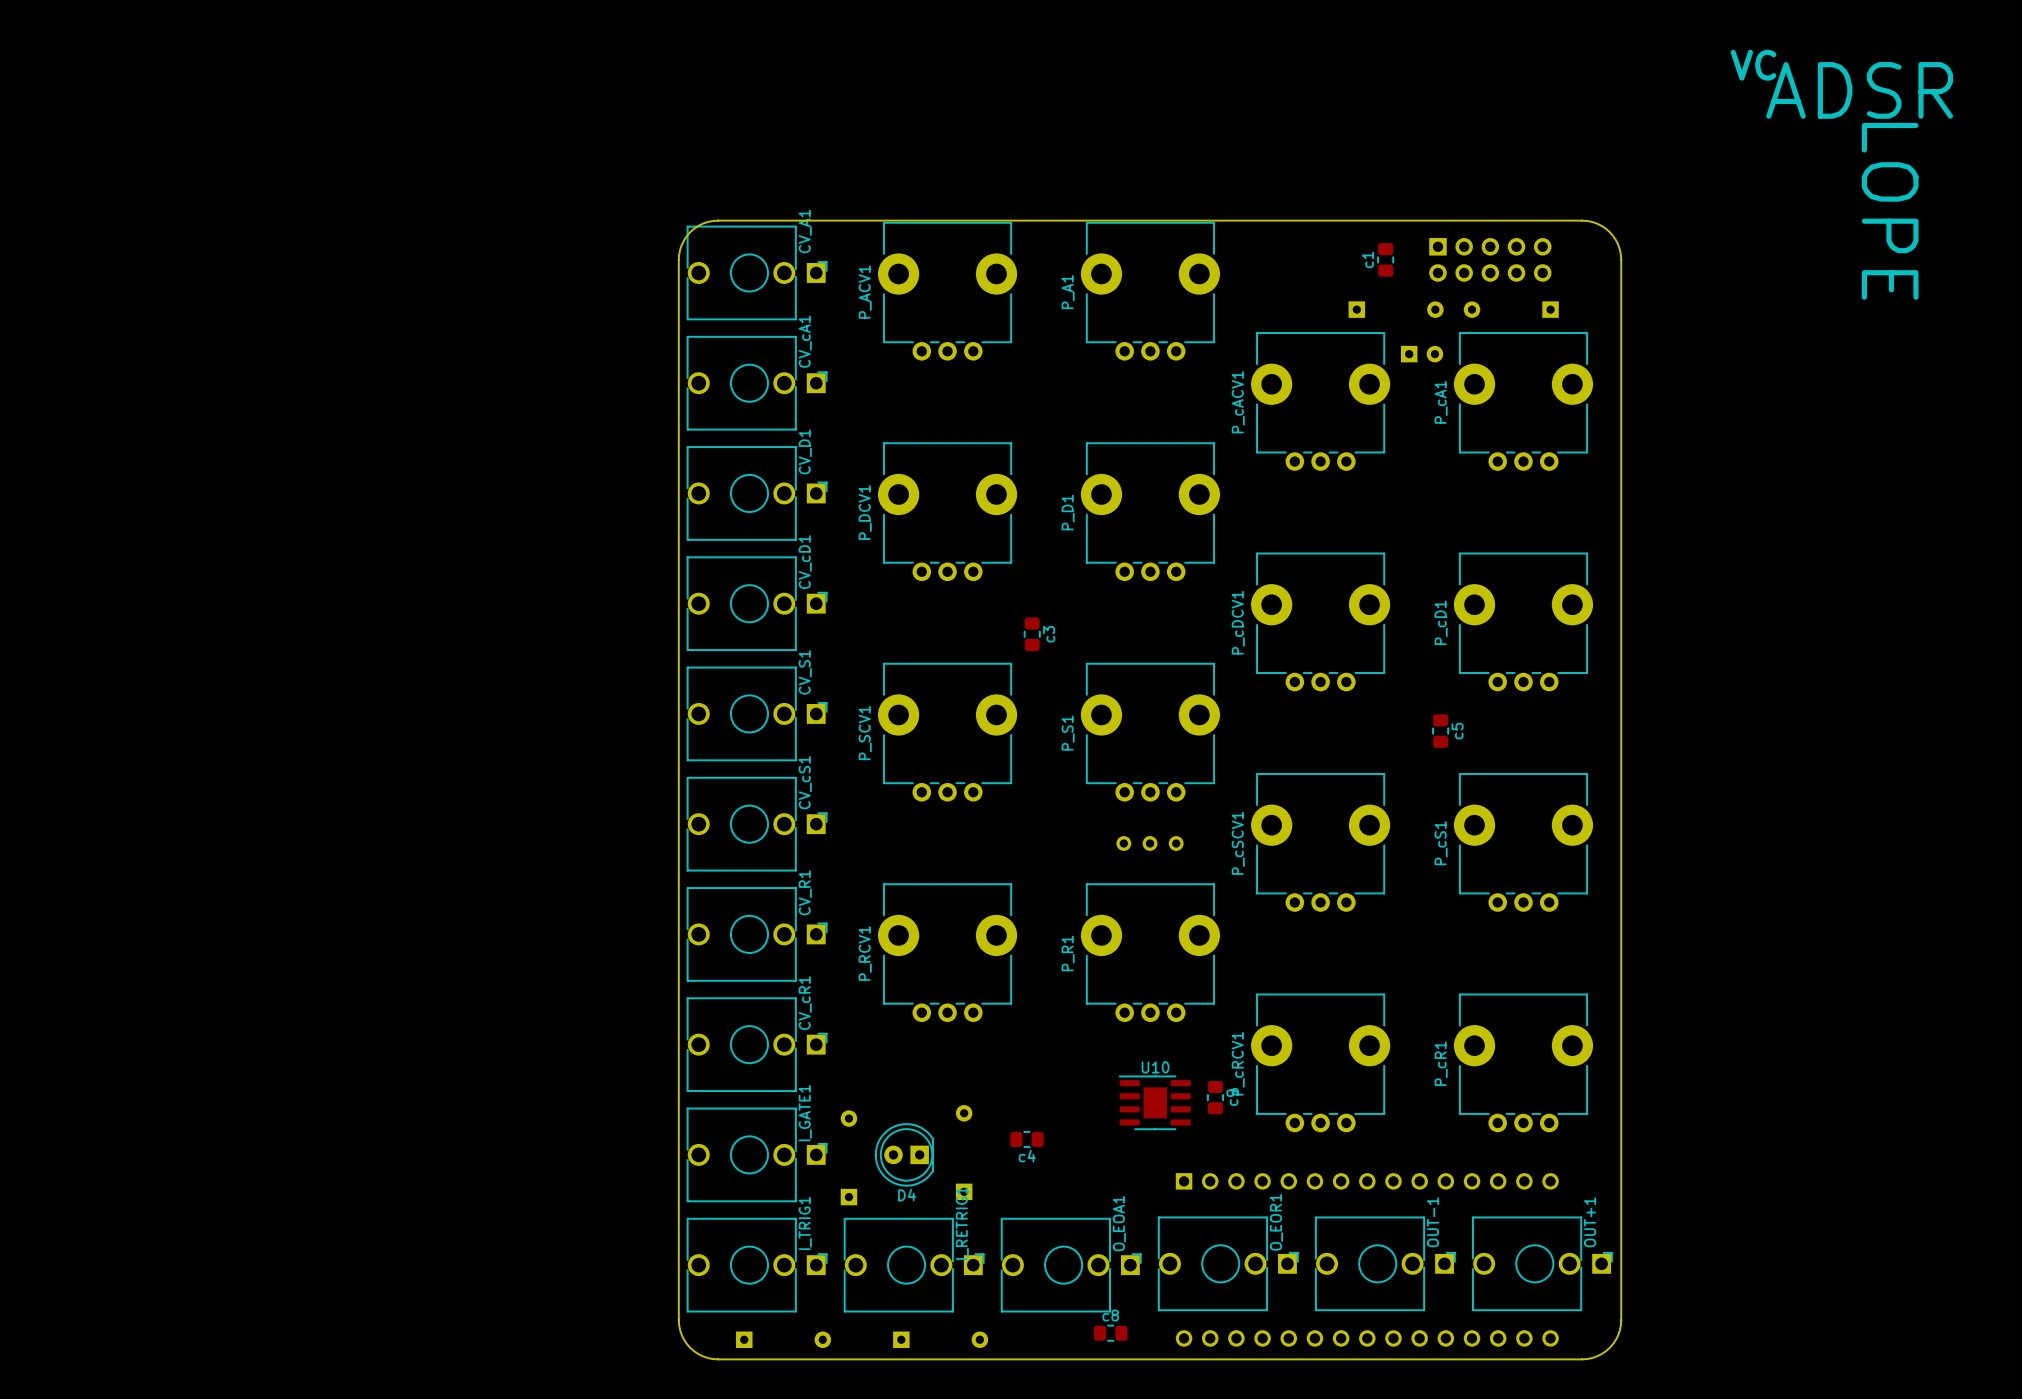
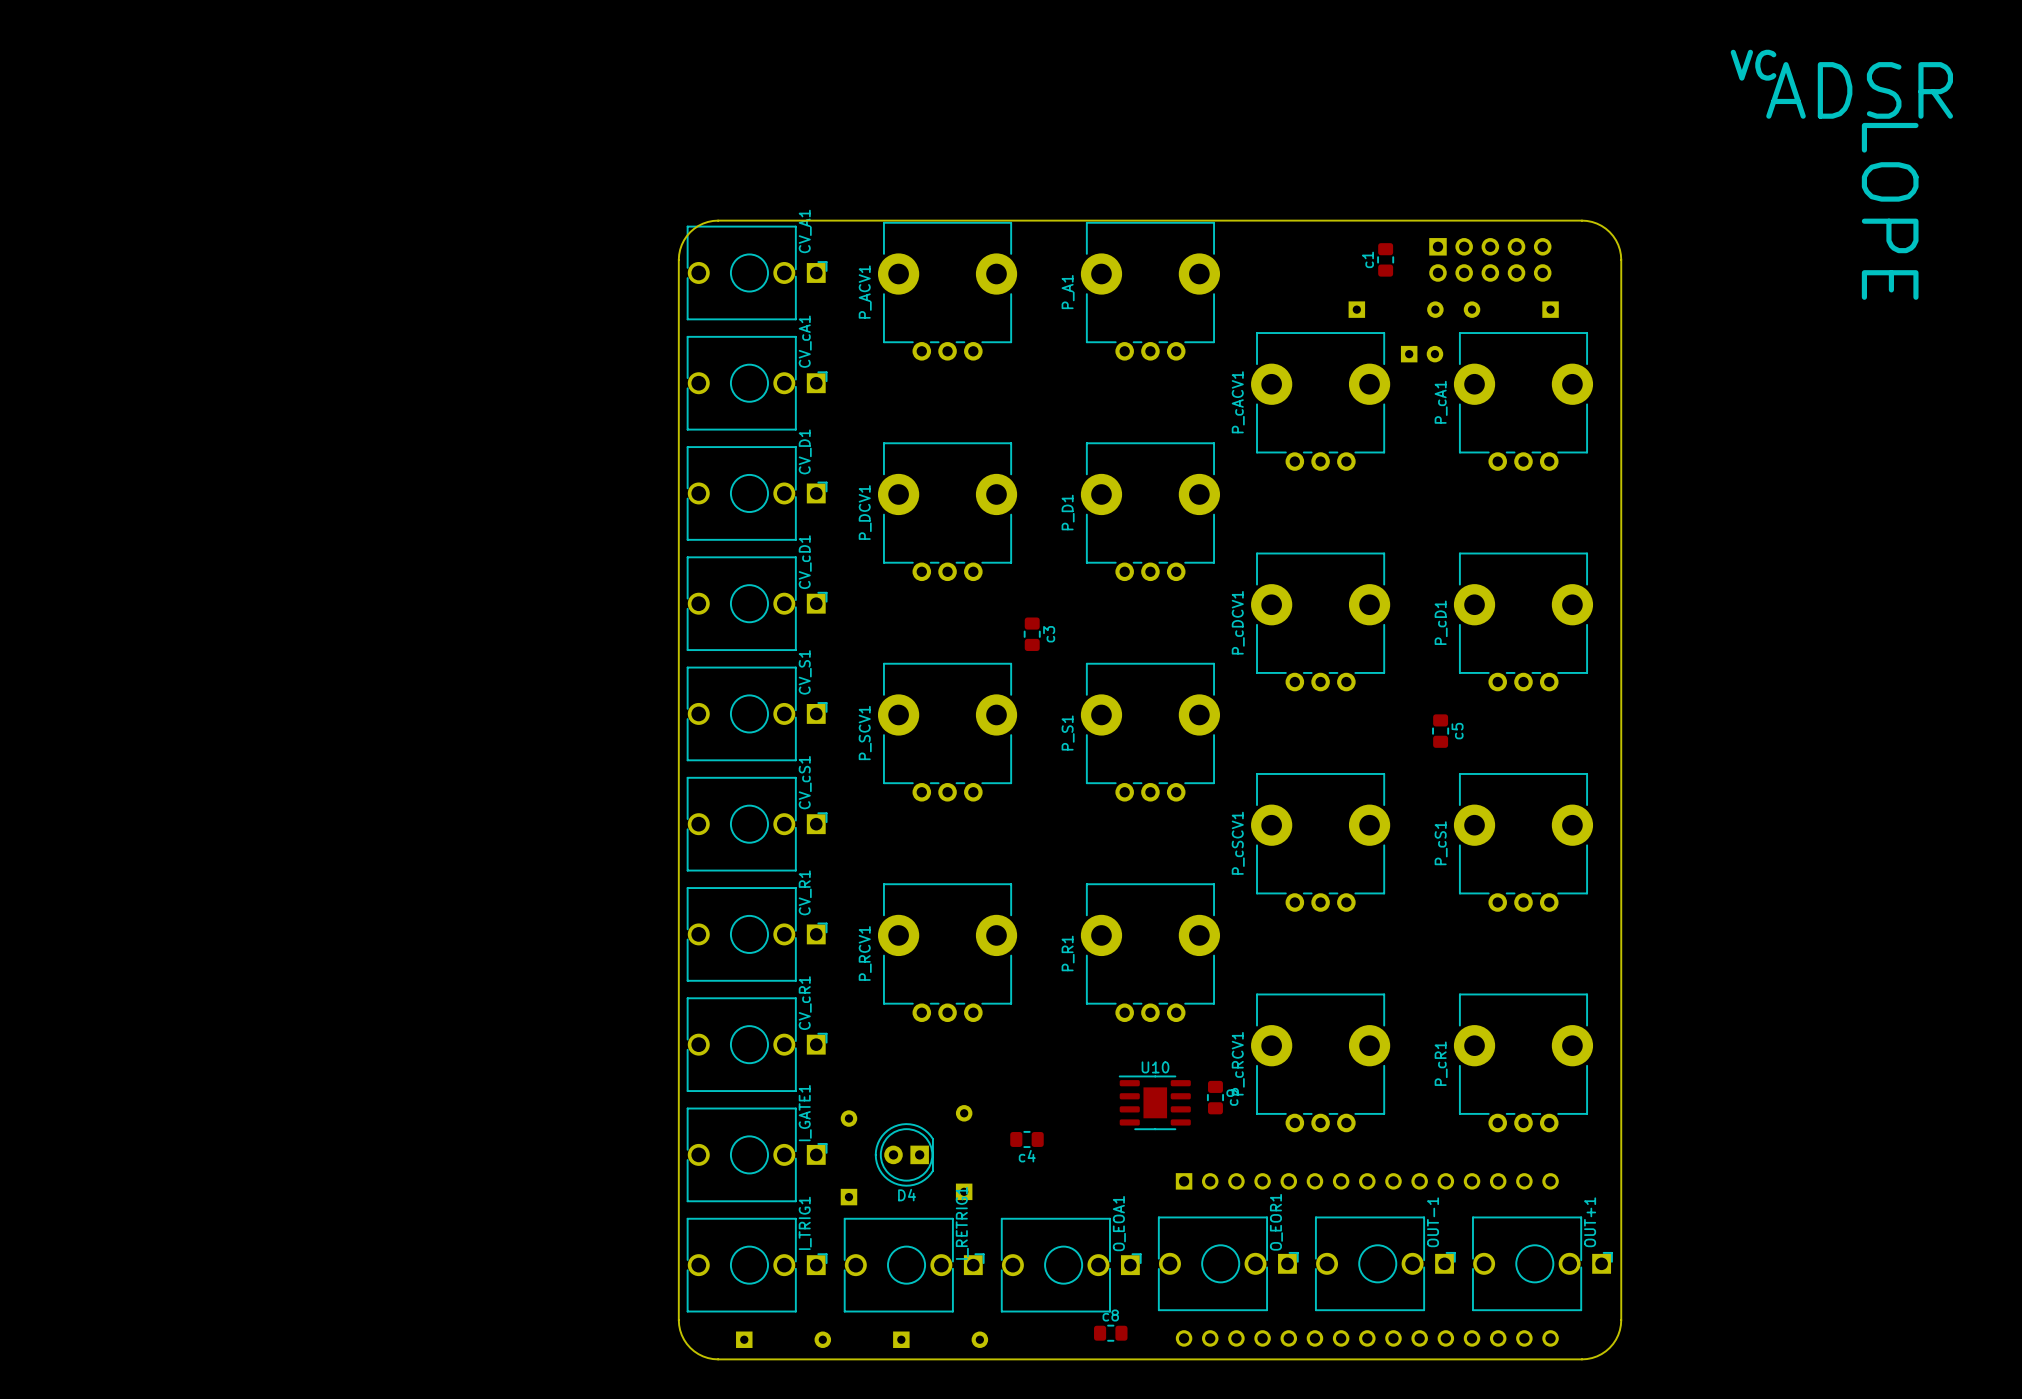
part: (1150, 843) -> none

